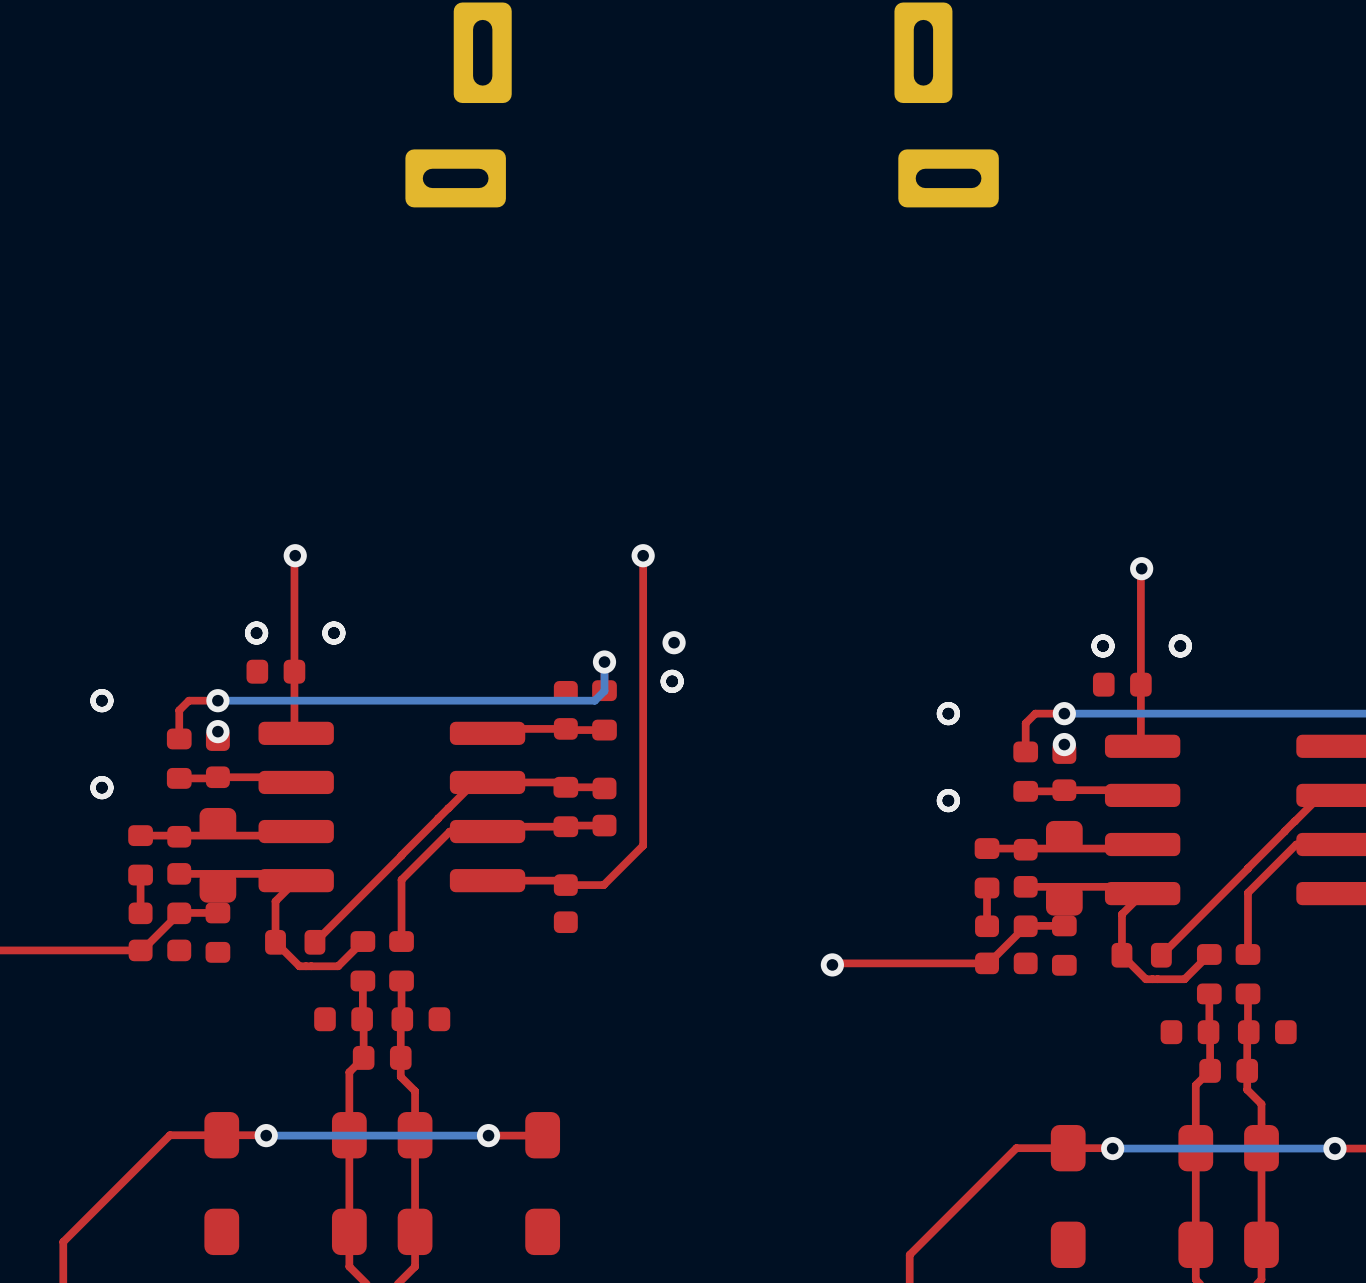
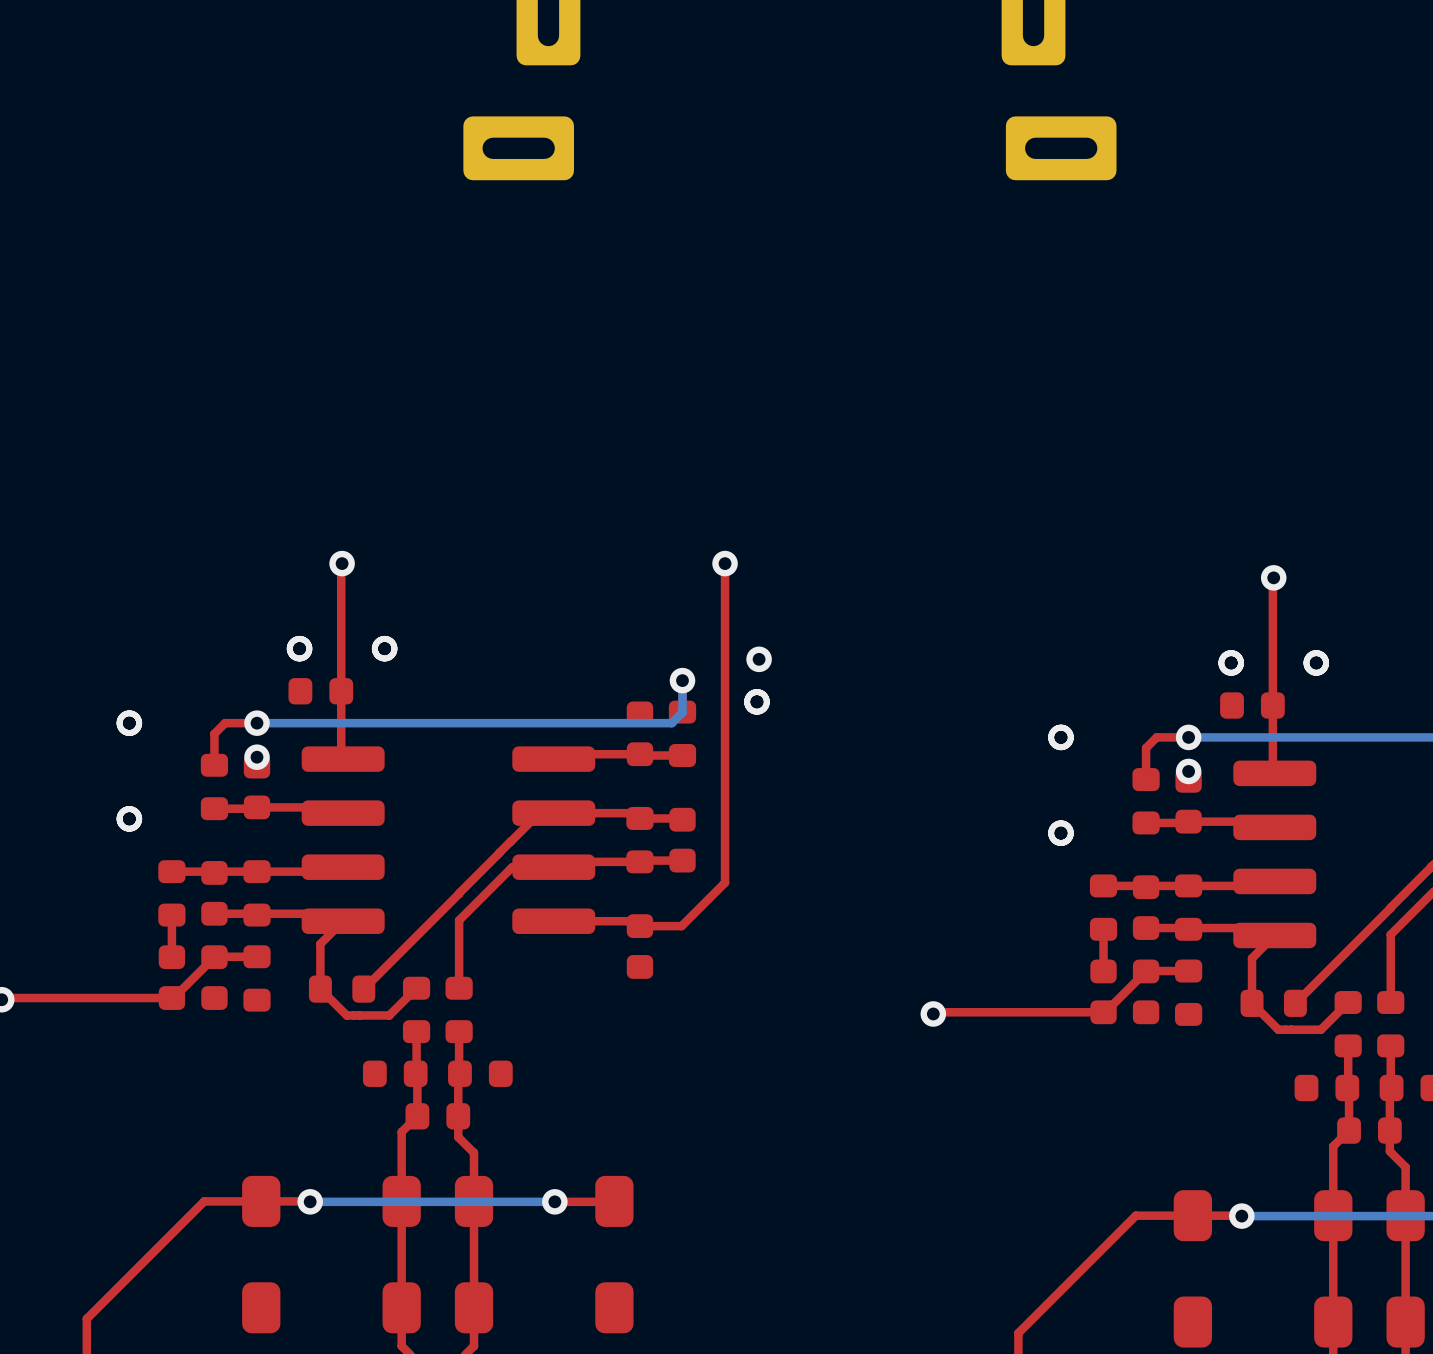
part footprint: [199, 807, 237, 903] -> [243, 860, 271, 927]
part footprint: [1045, 820, 1083, 916] -> [1175, 874, 1203, 941]

